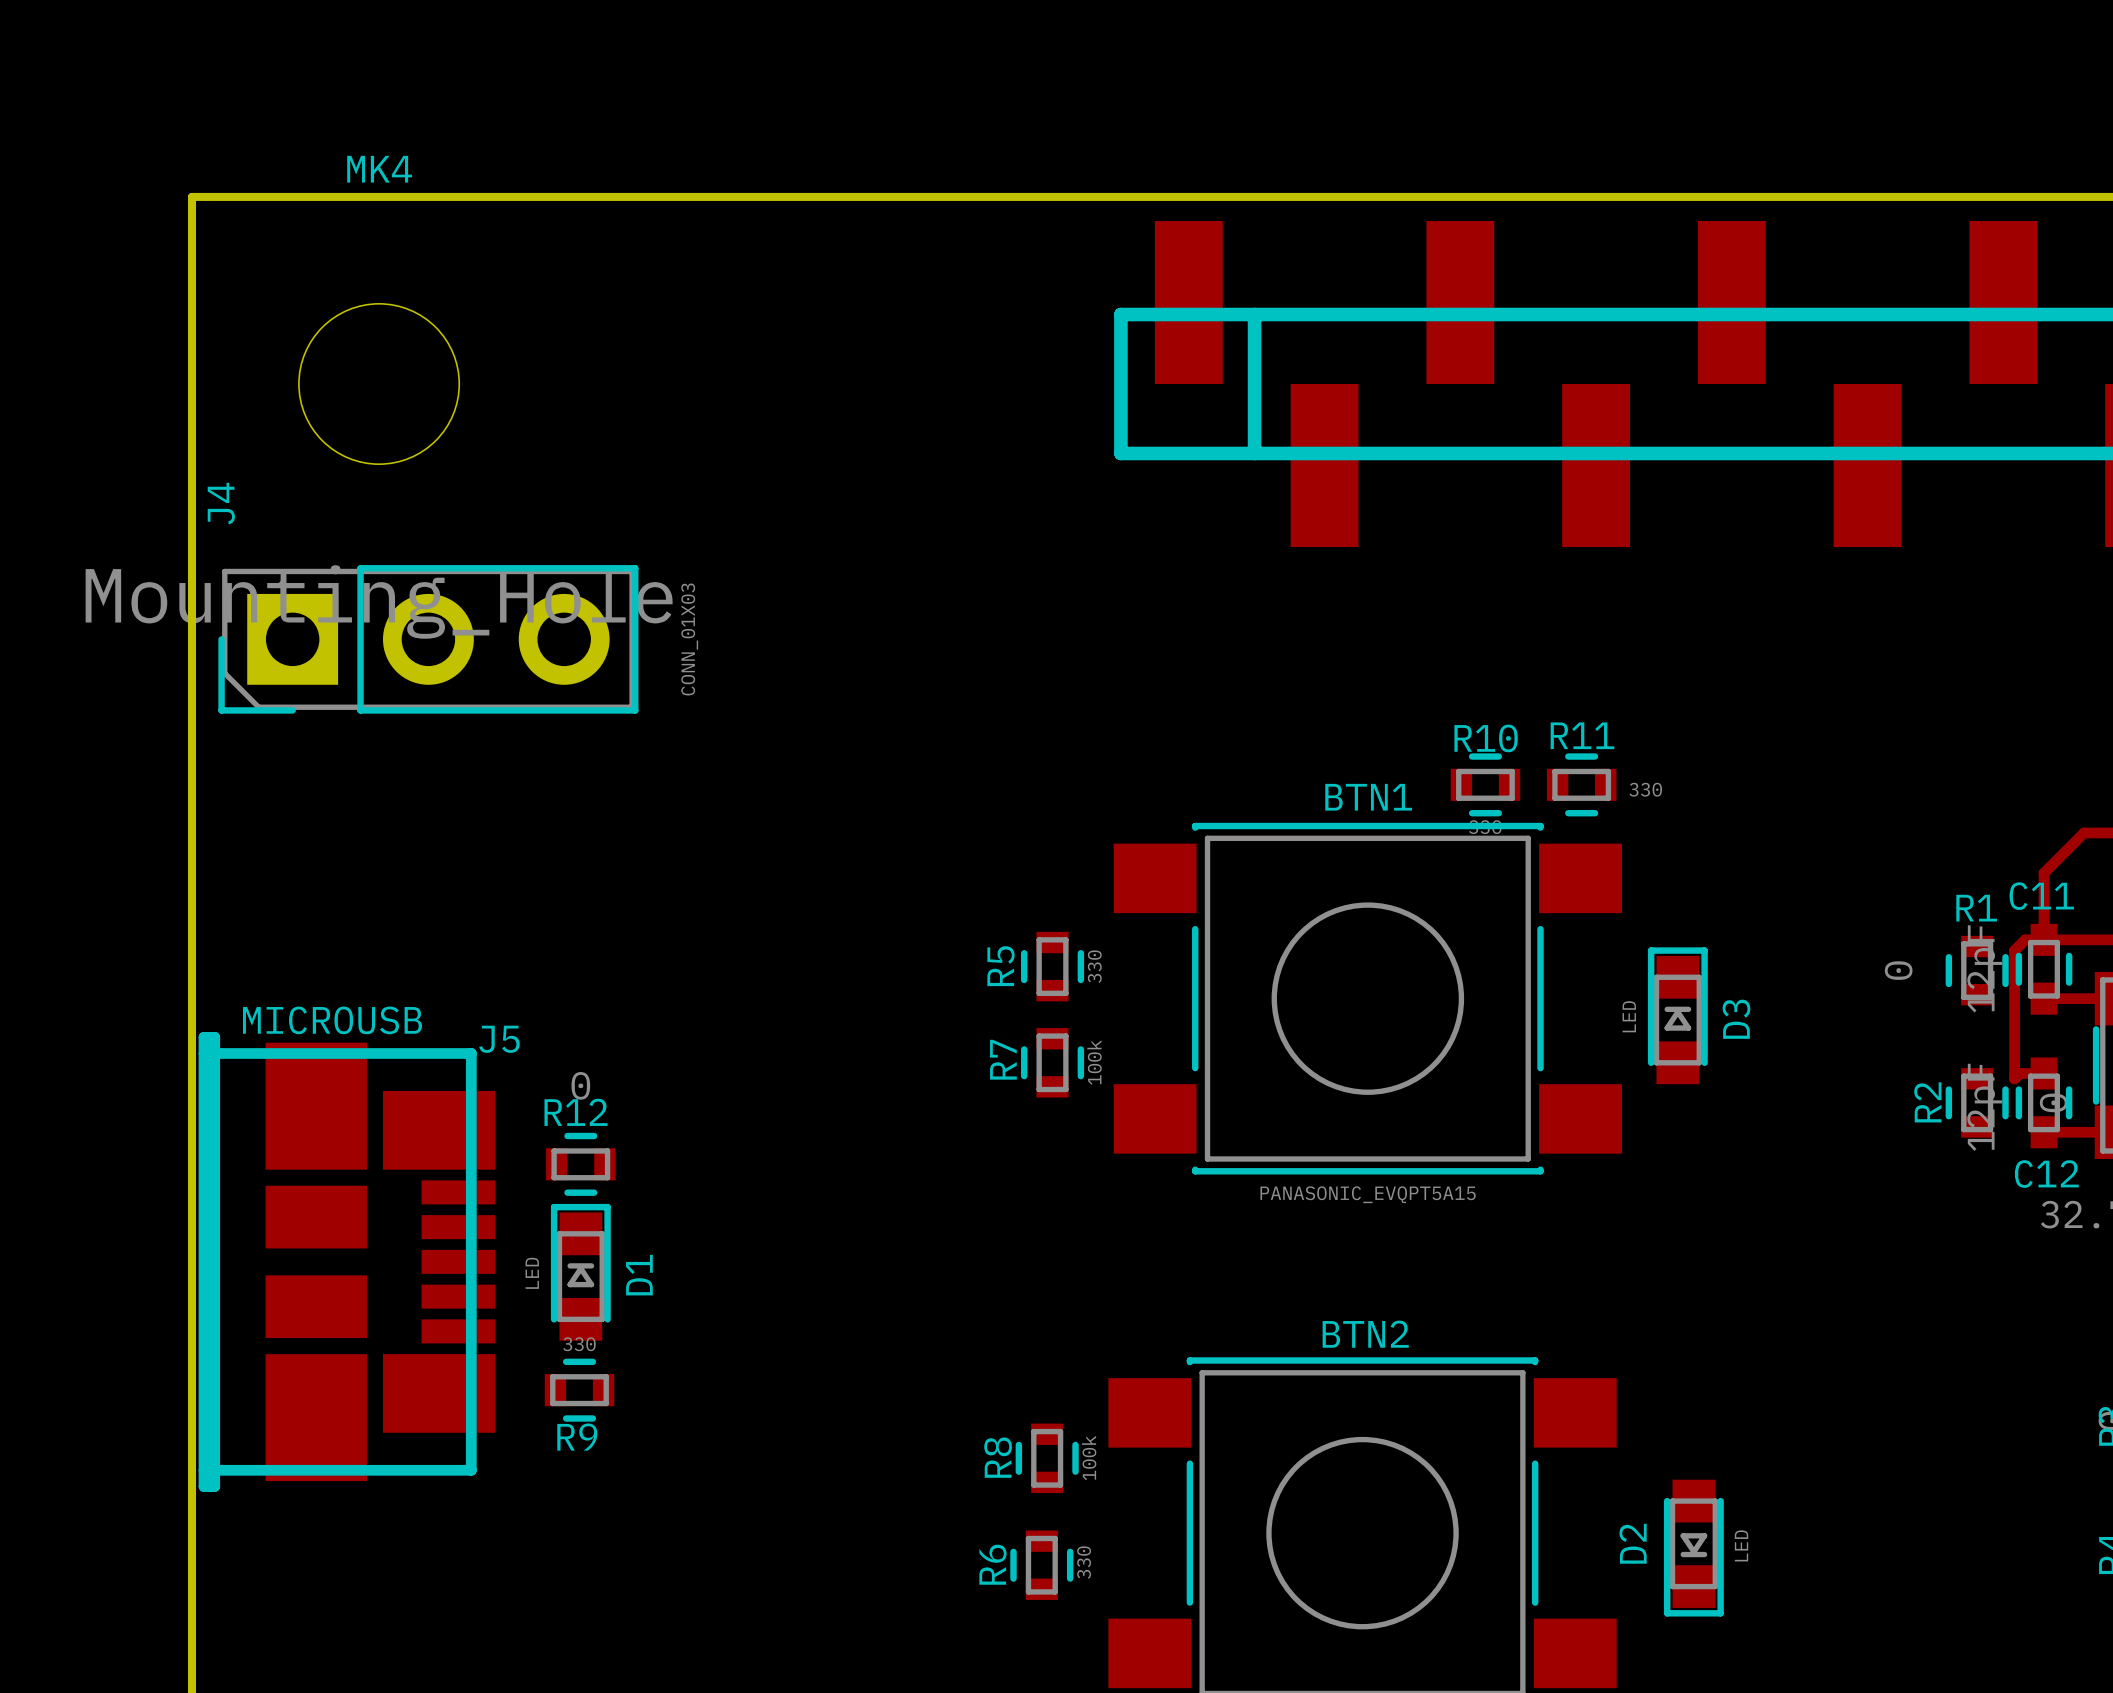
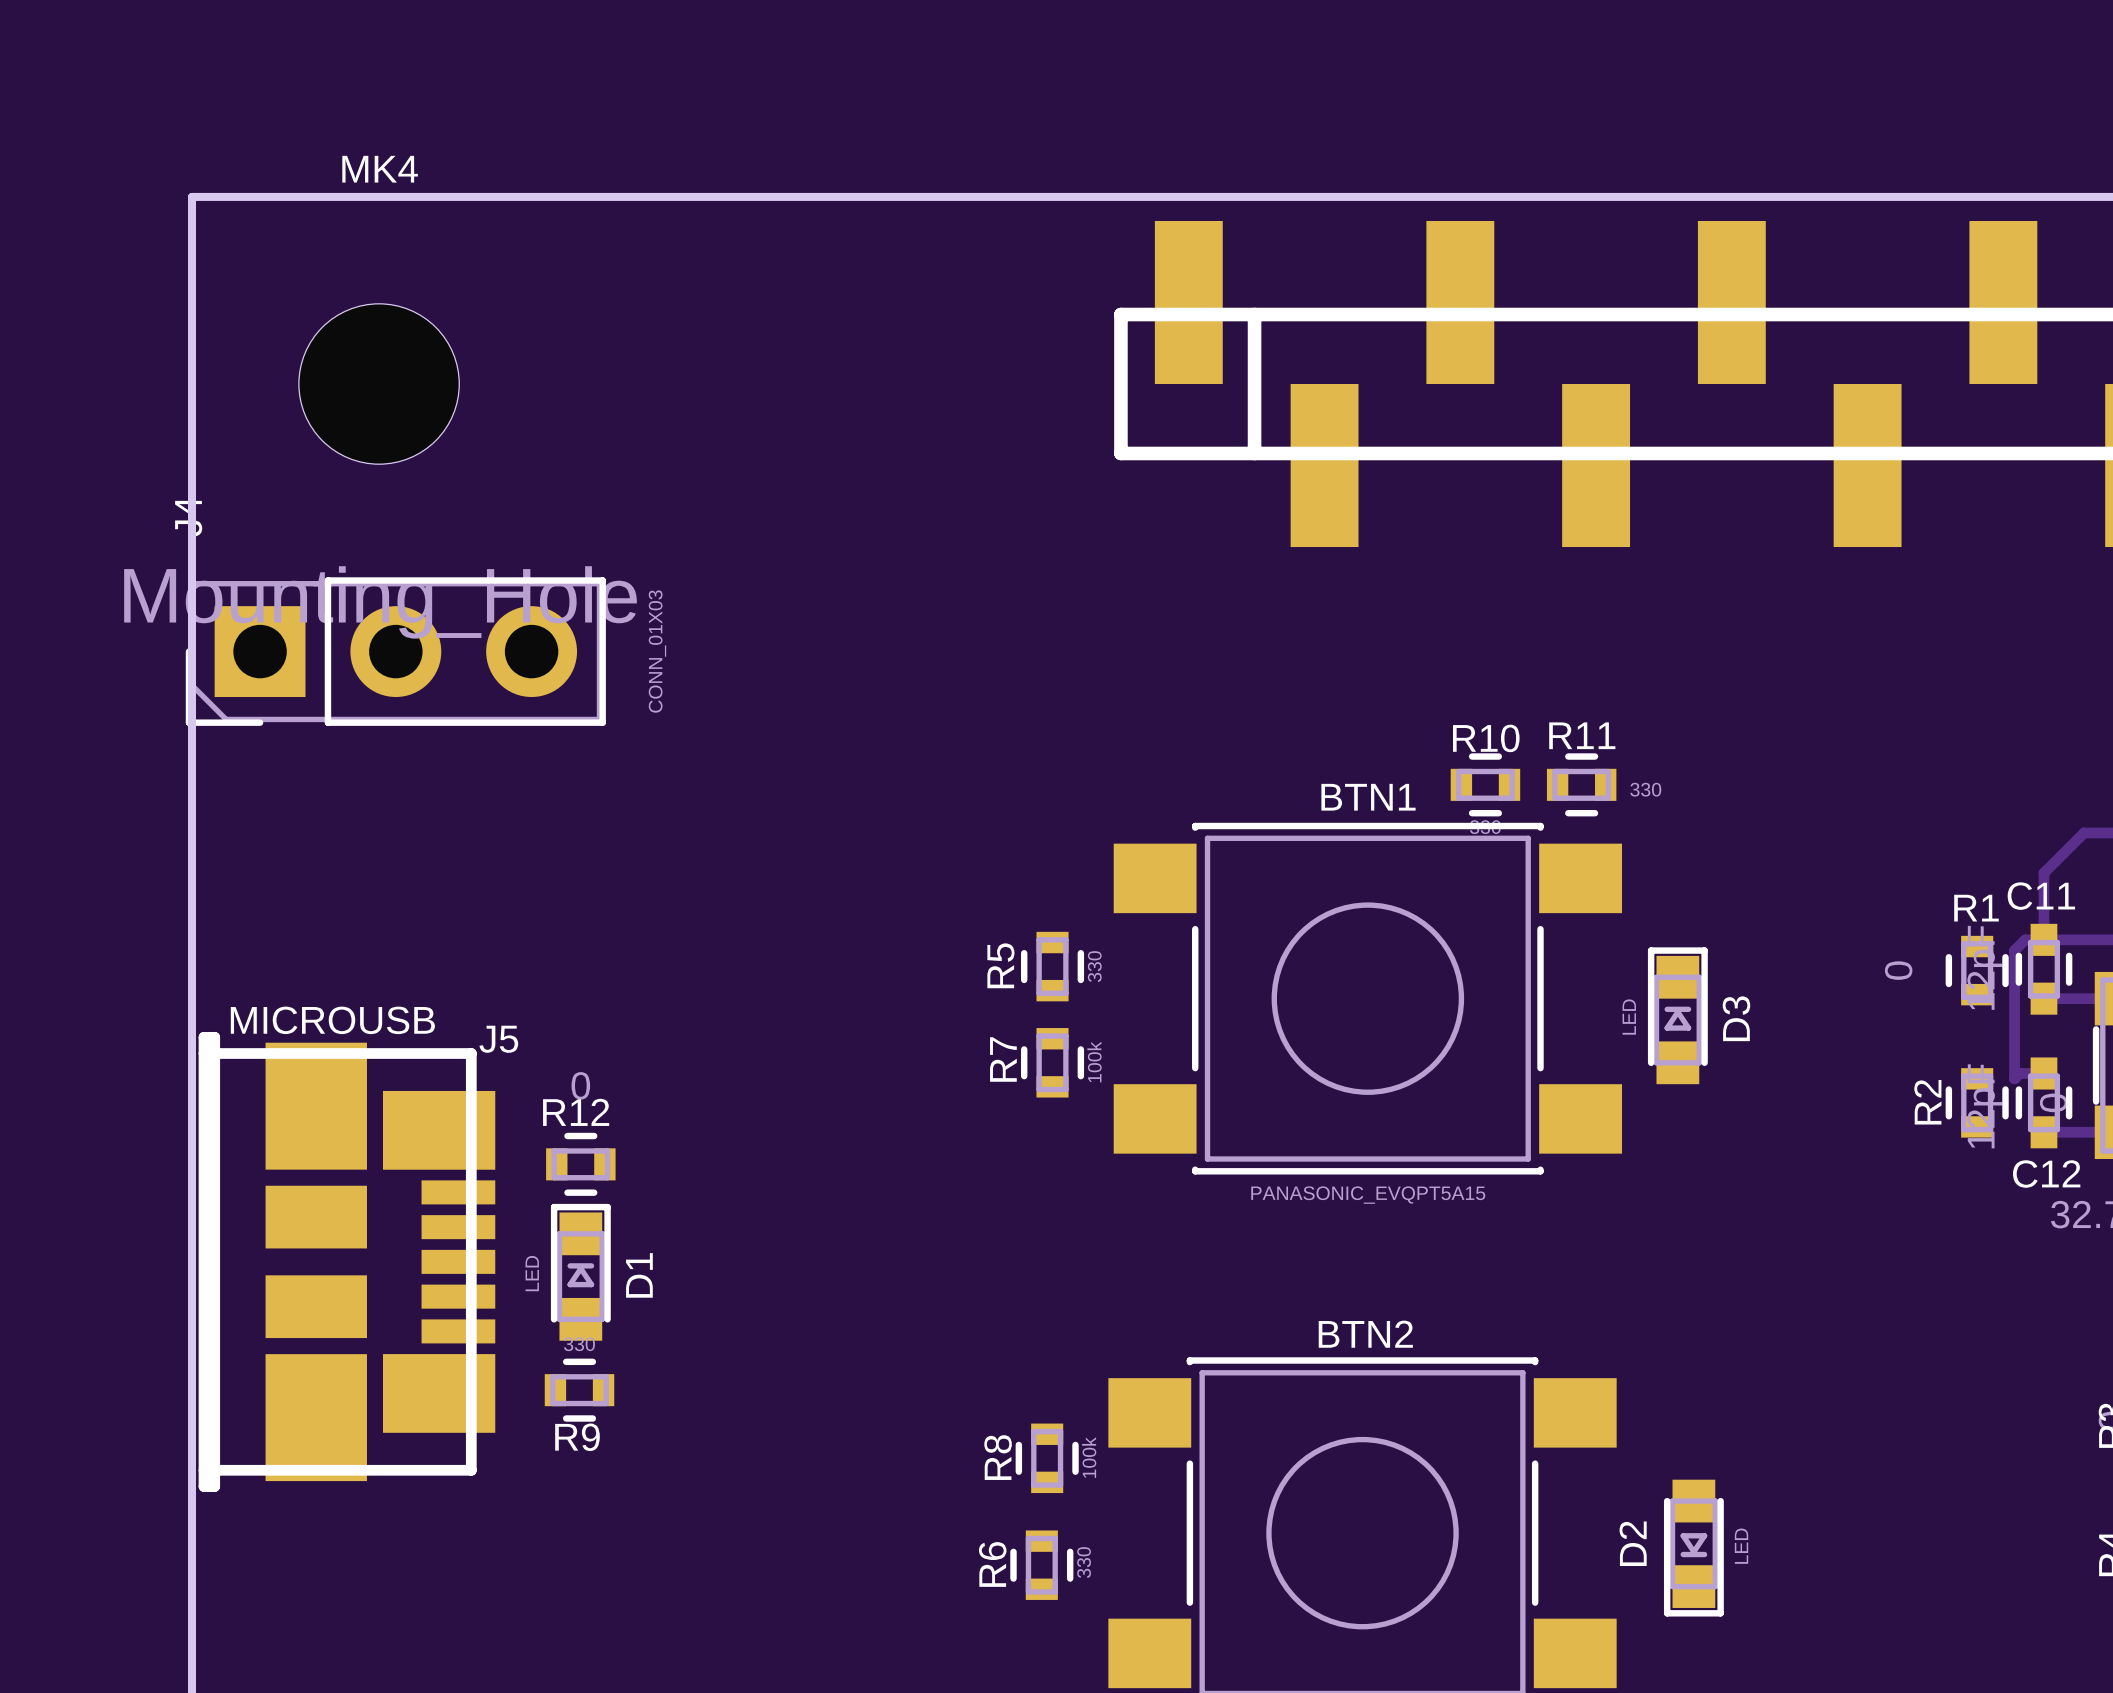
J4 position: (428, 639) -> (395, 651)

